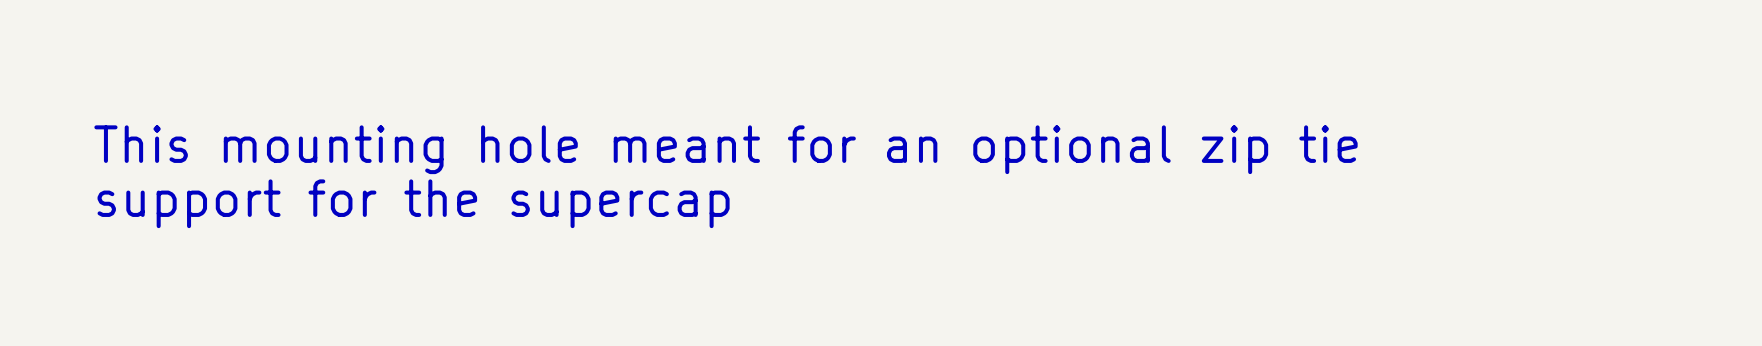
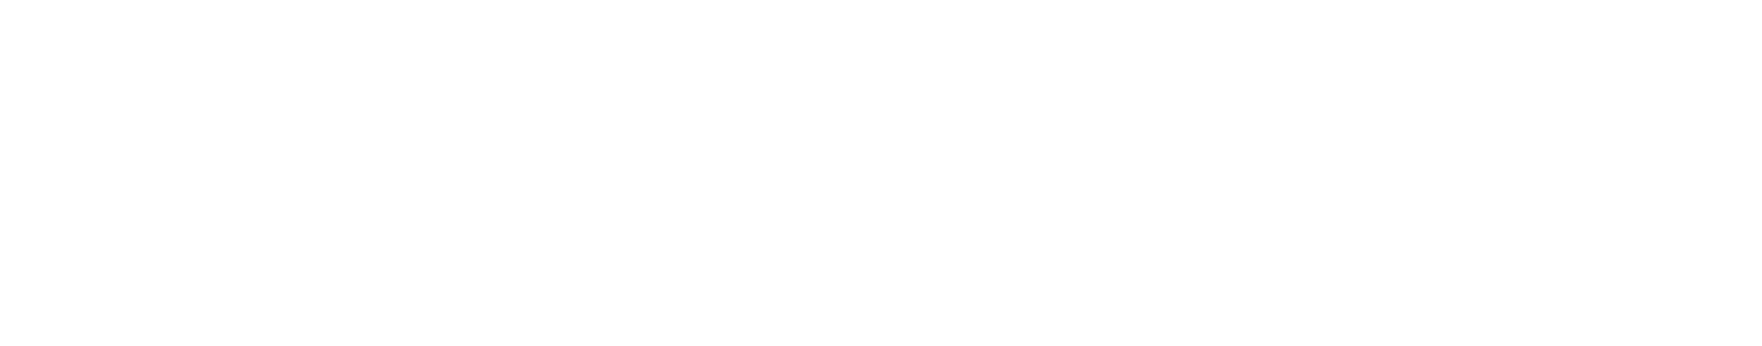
text: This mounting hole meant for an optional zip tie (725, 149) -> none
text: support for the supercap (413, 203) -> none

